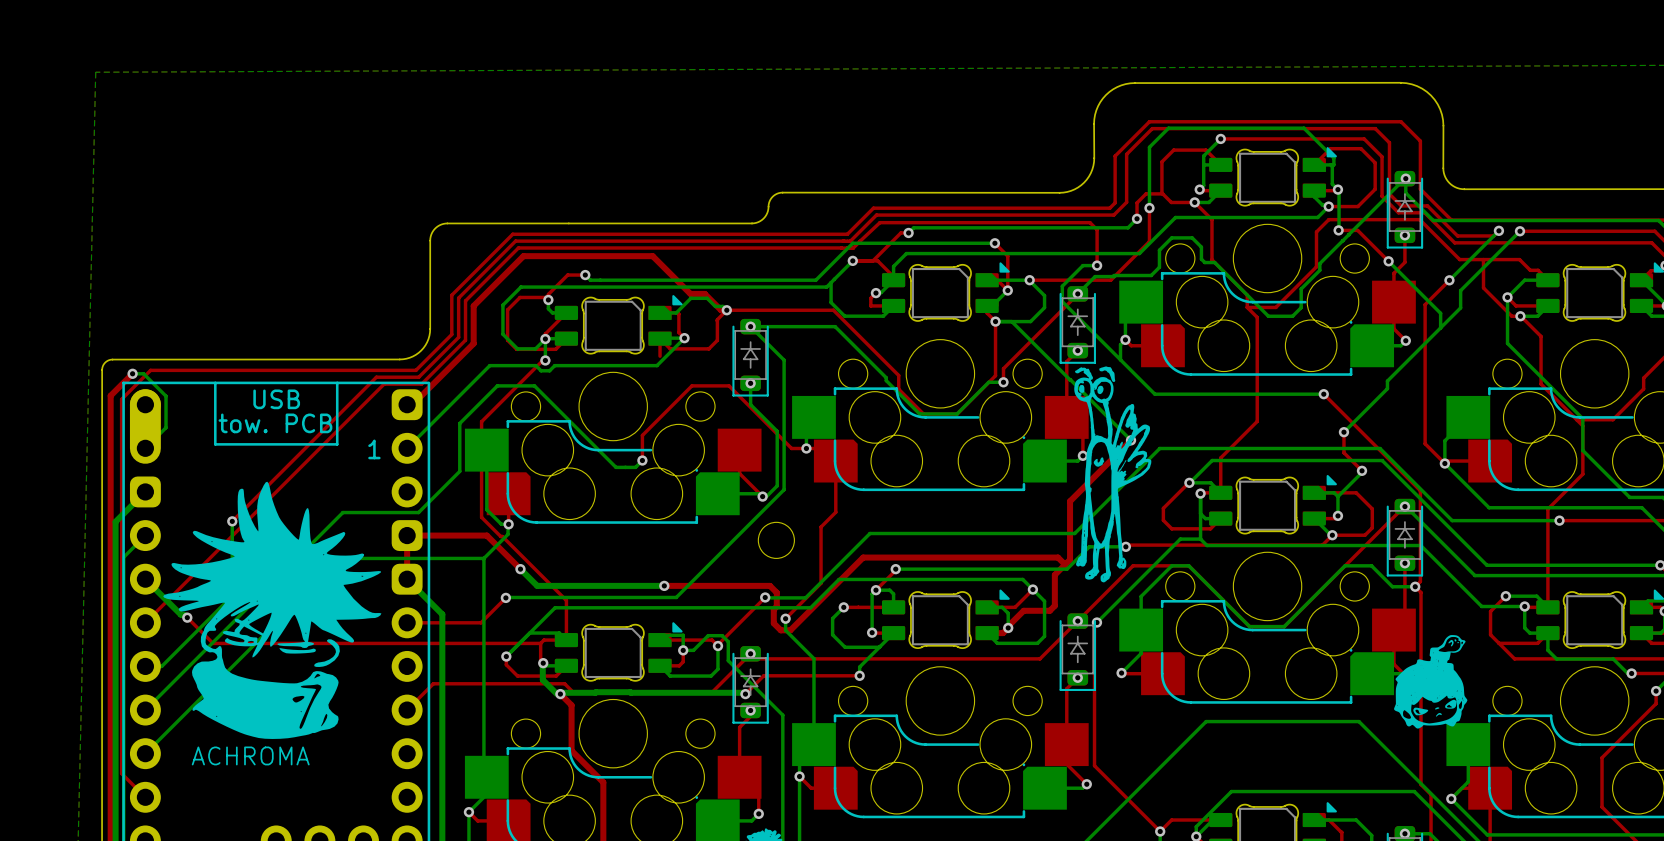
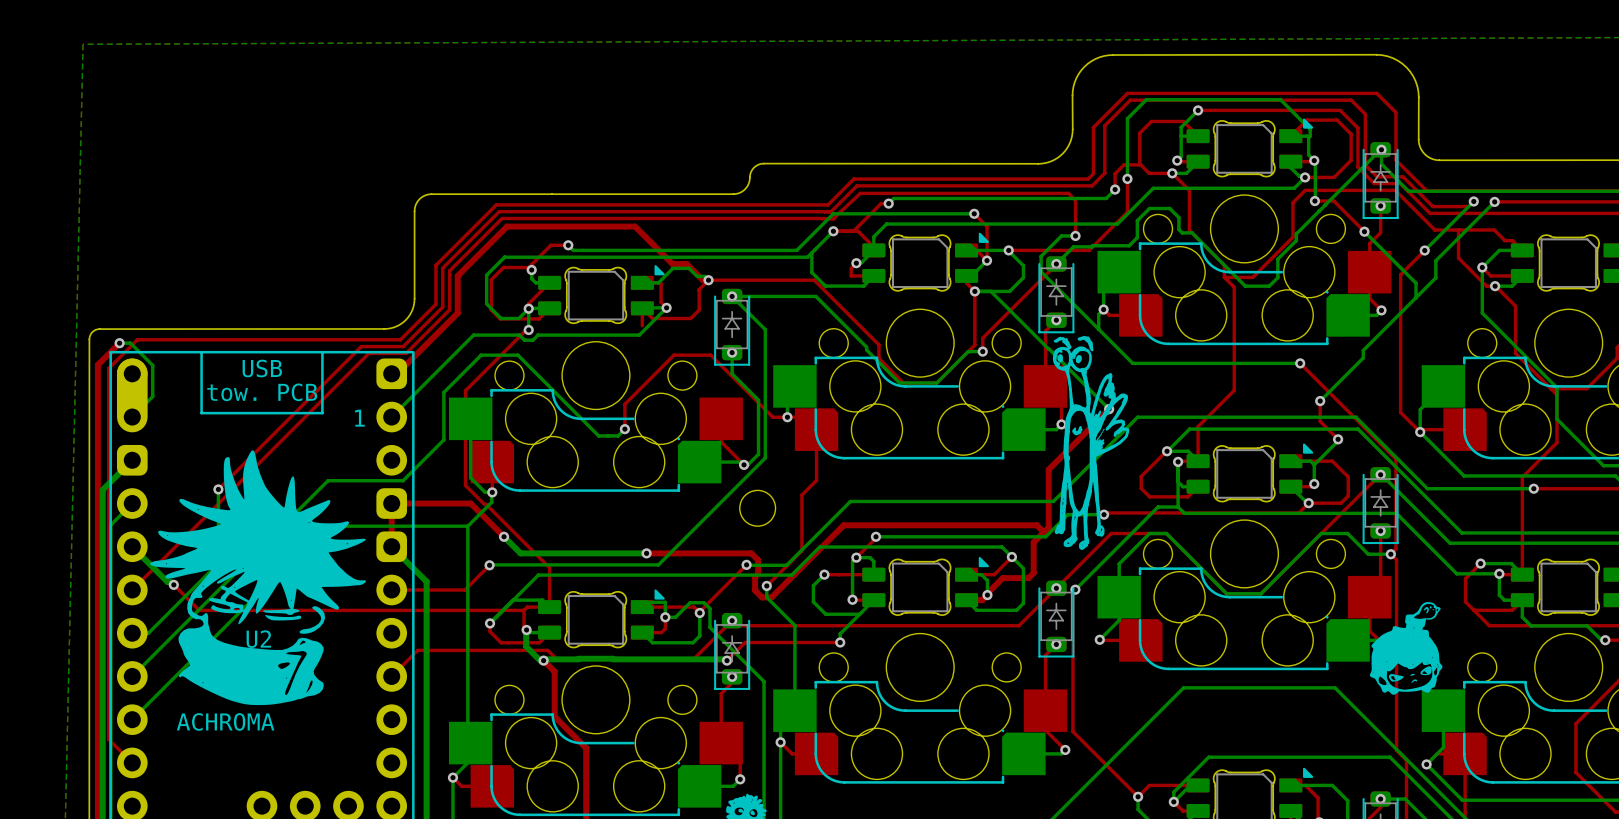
U2 name: none -> U2 (258, 639)

